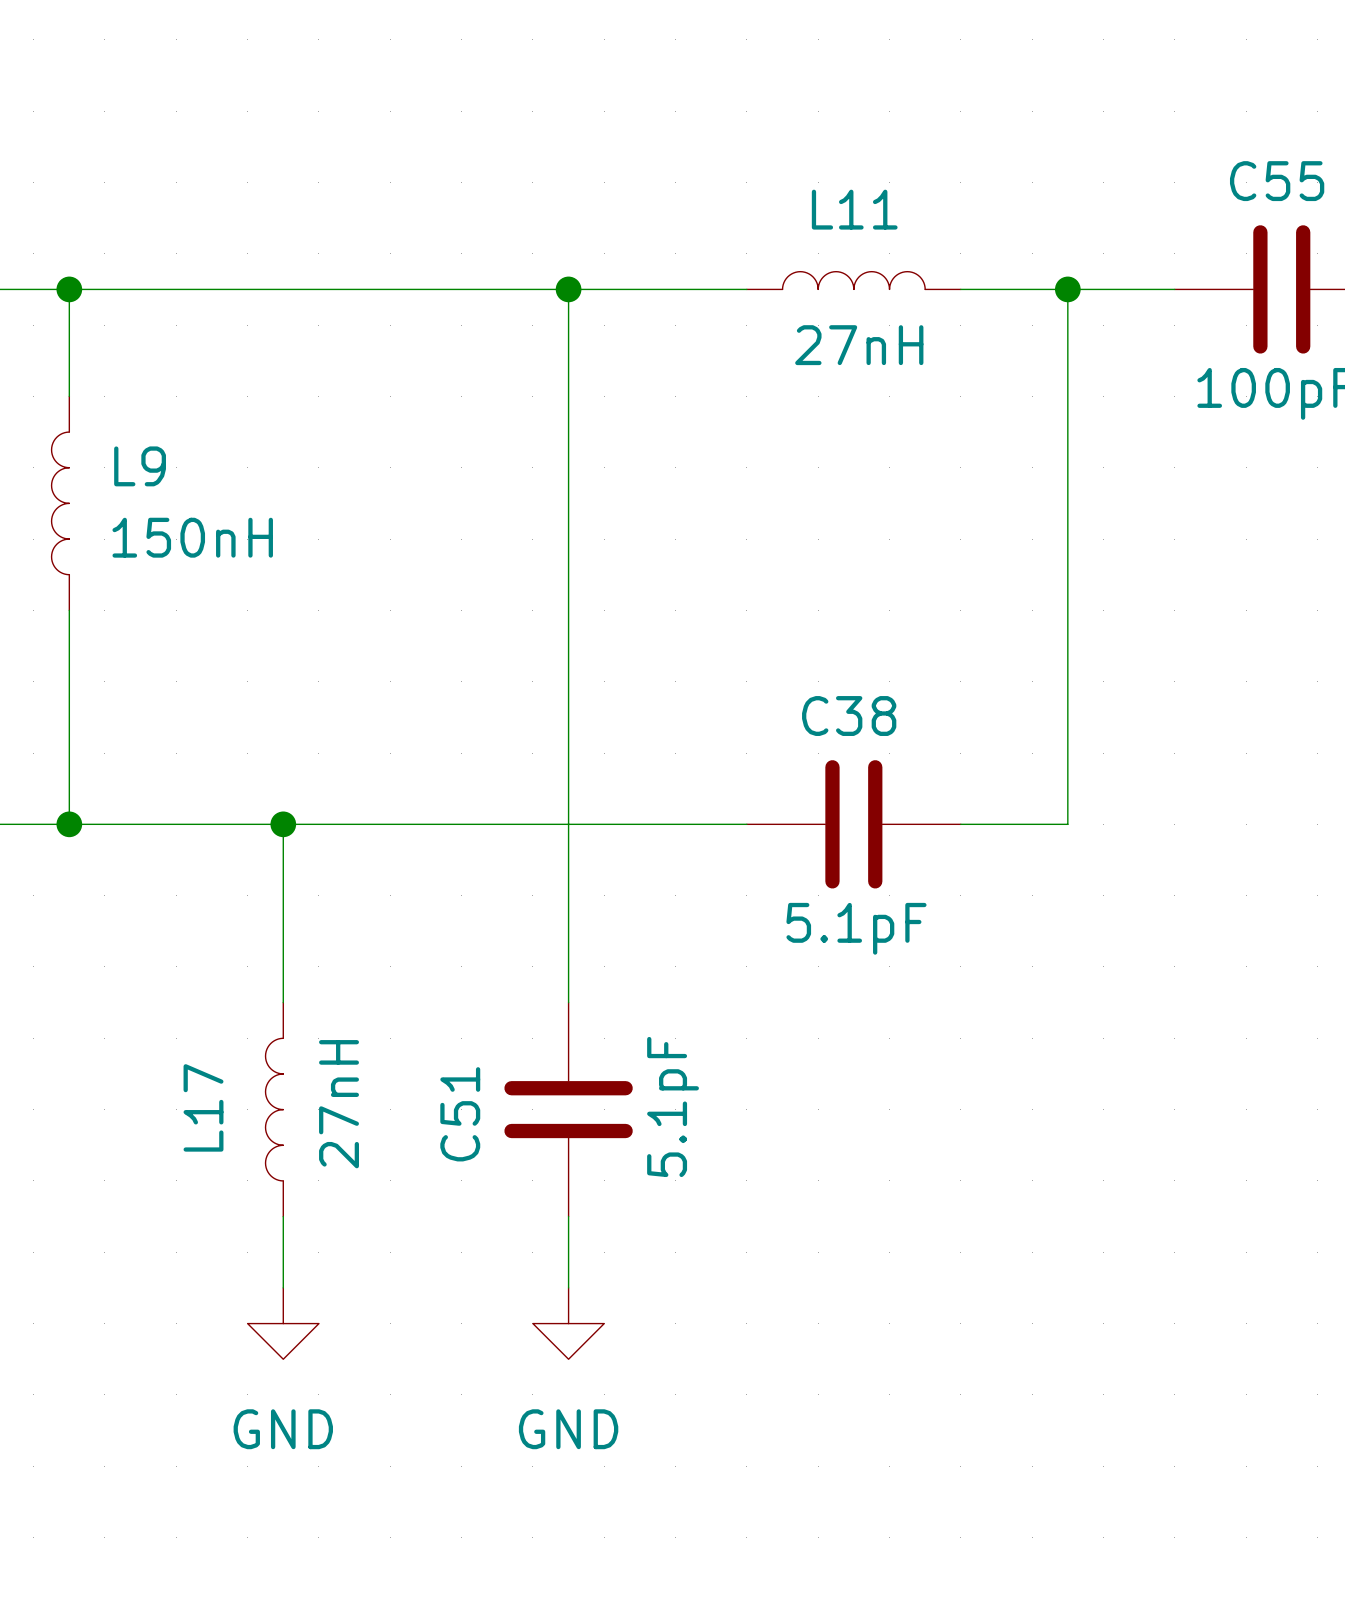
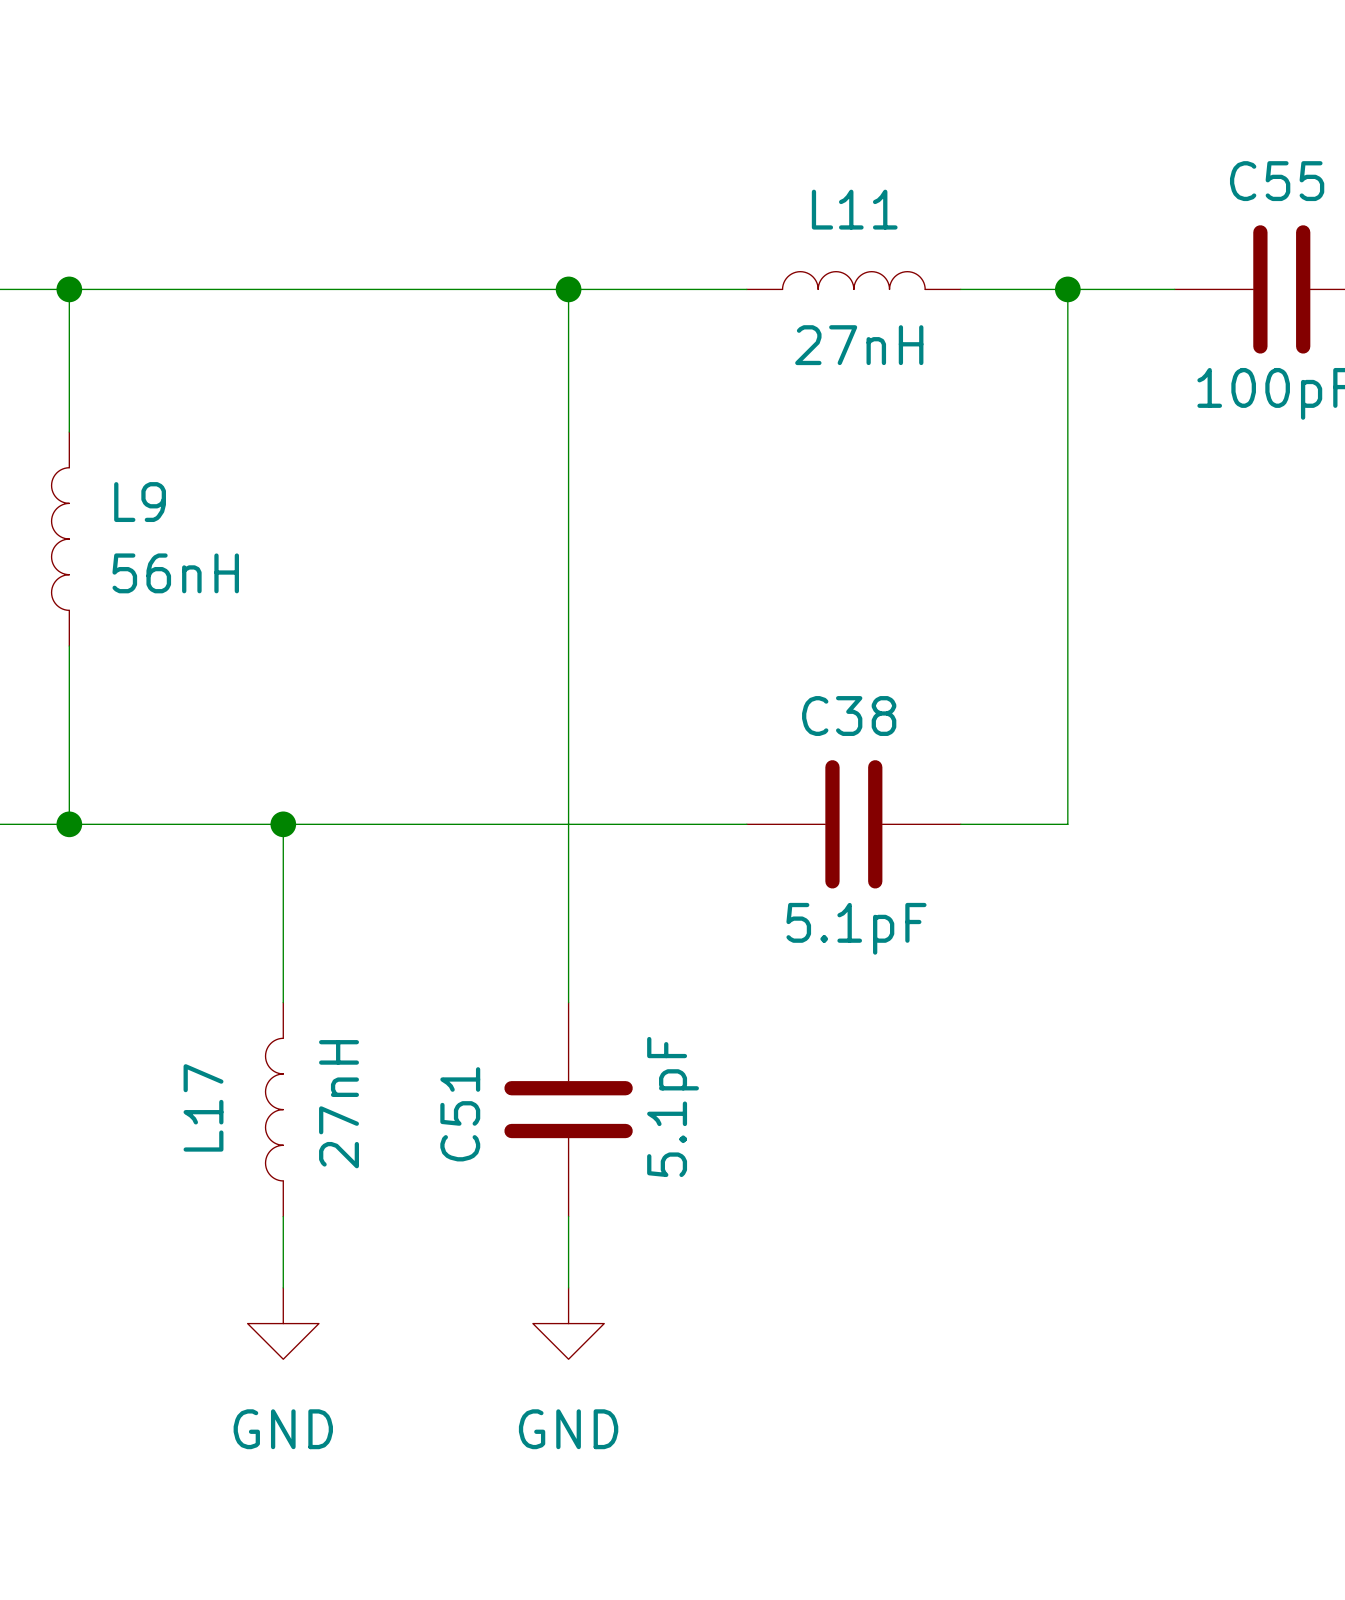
L9 position: (60, 503) -> (60, 539)
L9 value: 150nH (192, 537) -> 56nH (175, 573)

